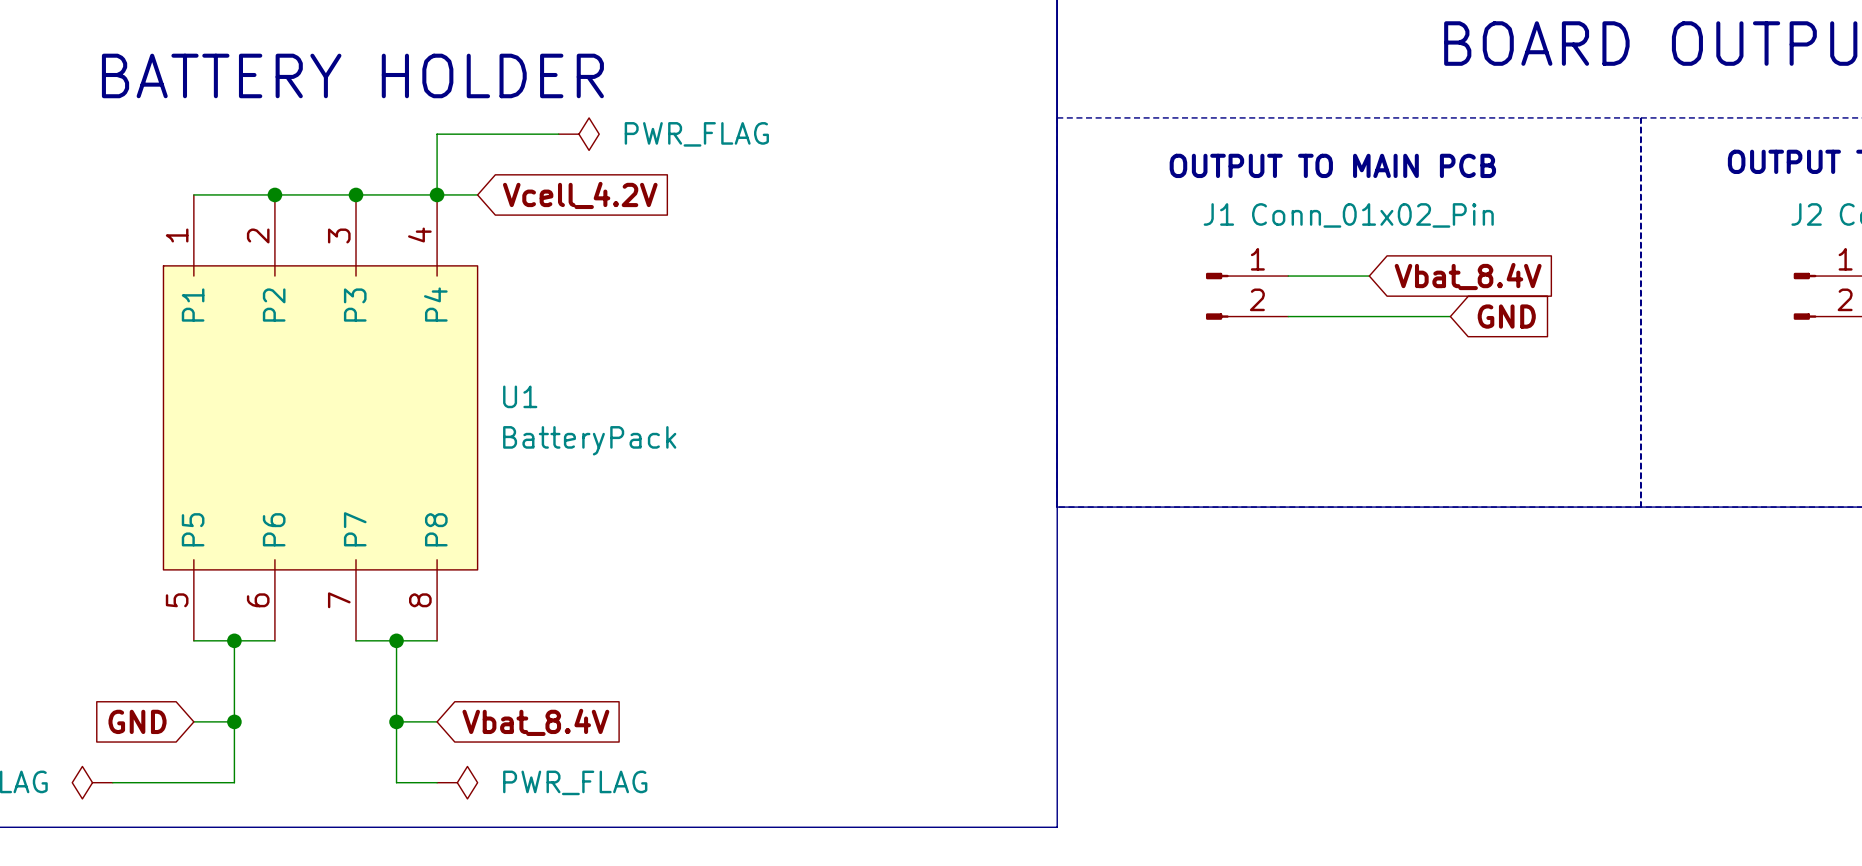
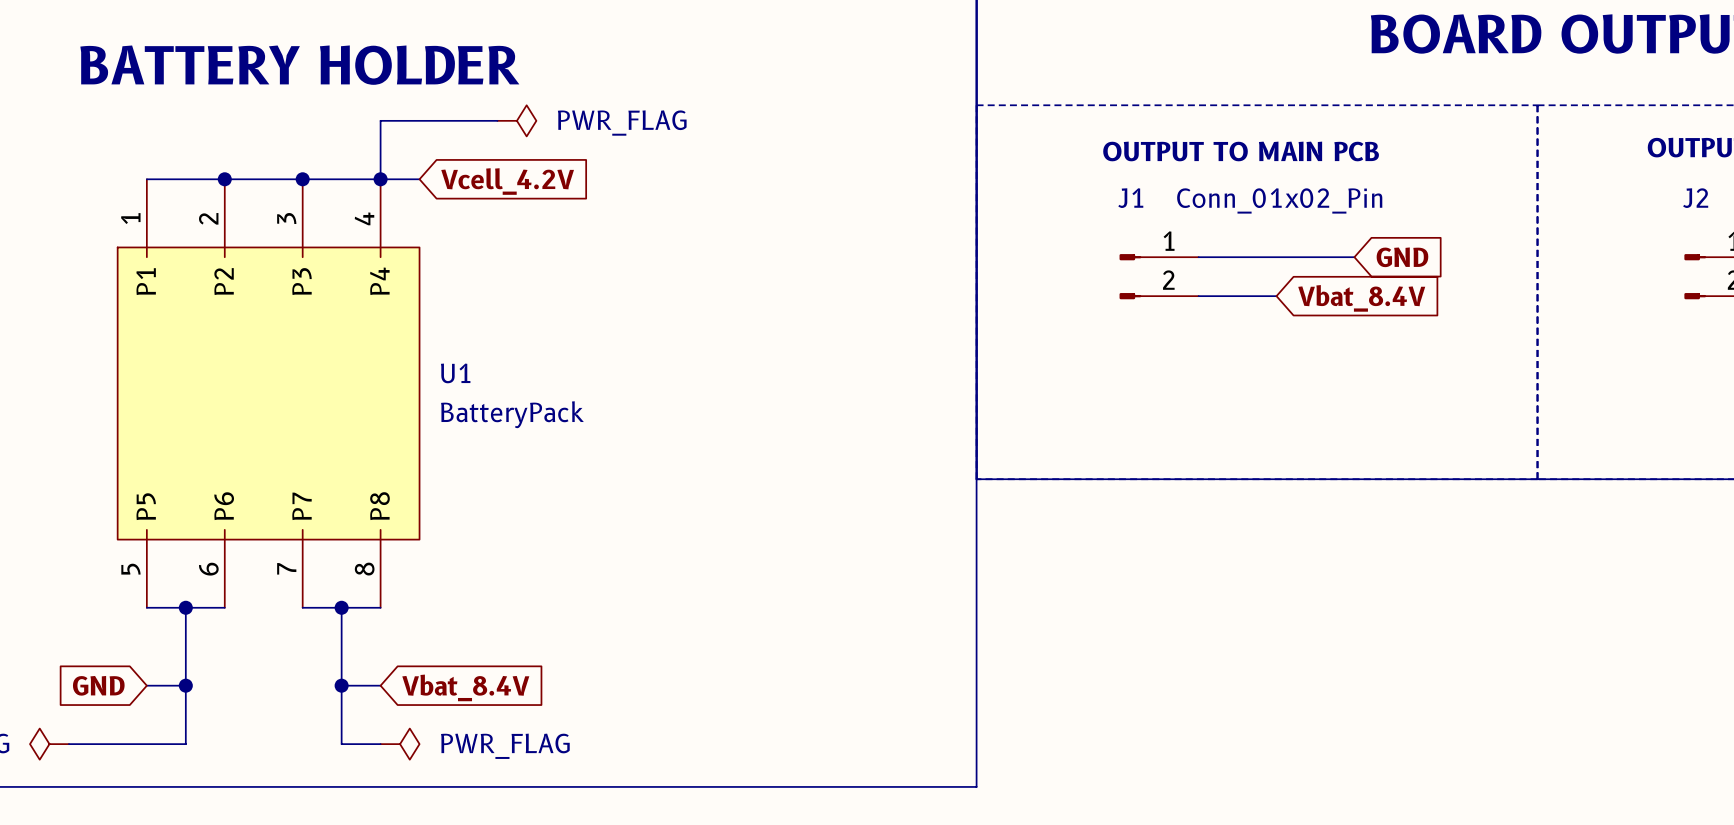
global label position: Vbat_8.4V (1468, 276) -> Vbat_8.4V (1361, 298)
wire: (1369, 316) (1450, 316) -> (1276, 257) (1354, 257)
global label position: GND (1506, 316) -> GND (1402, 257)

